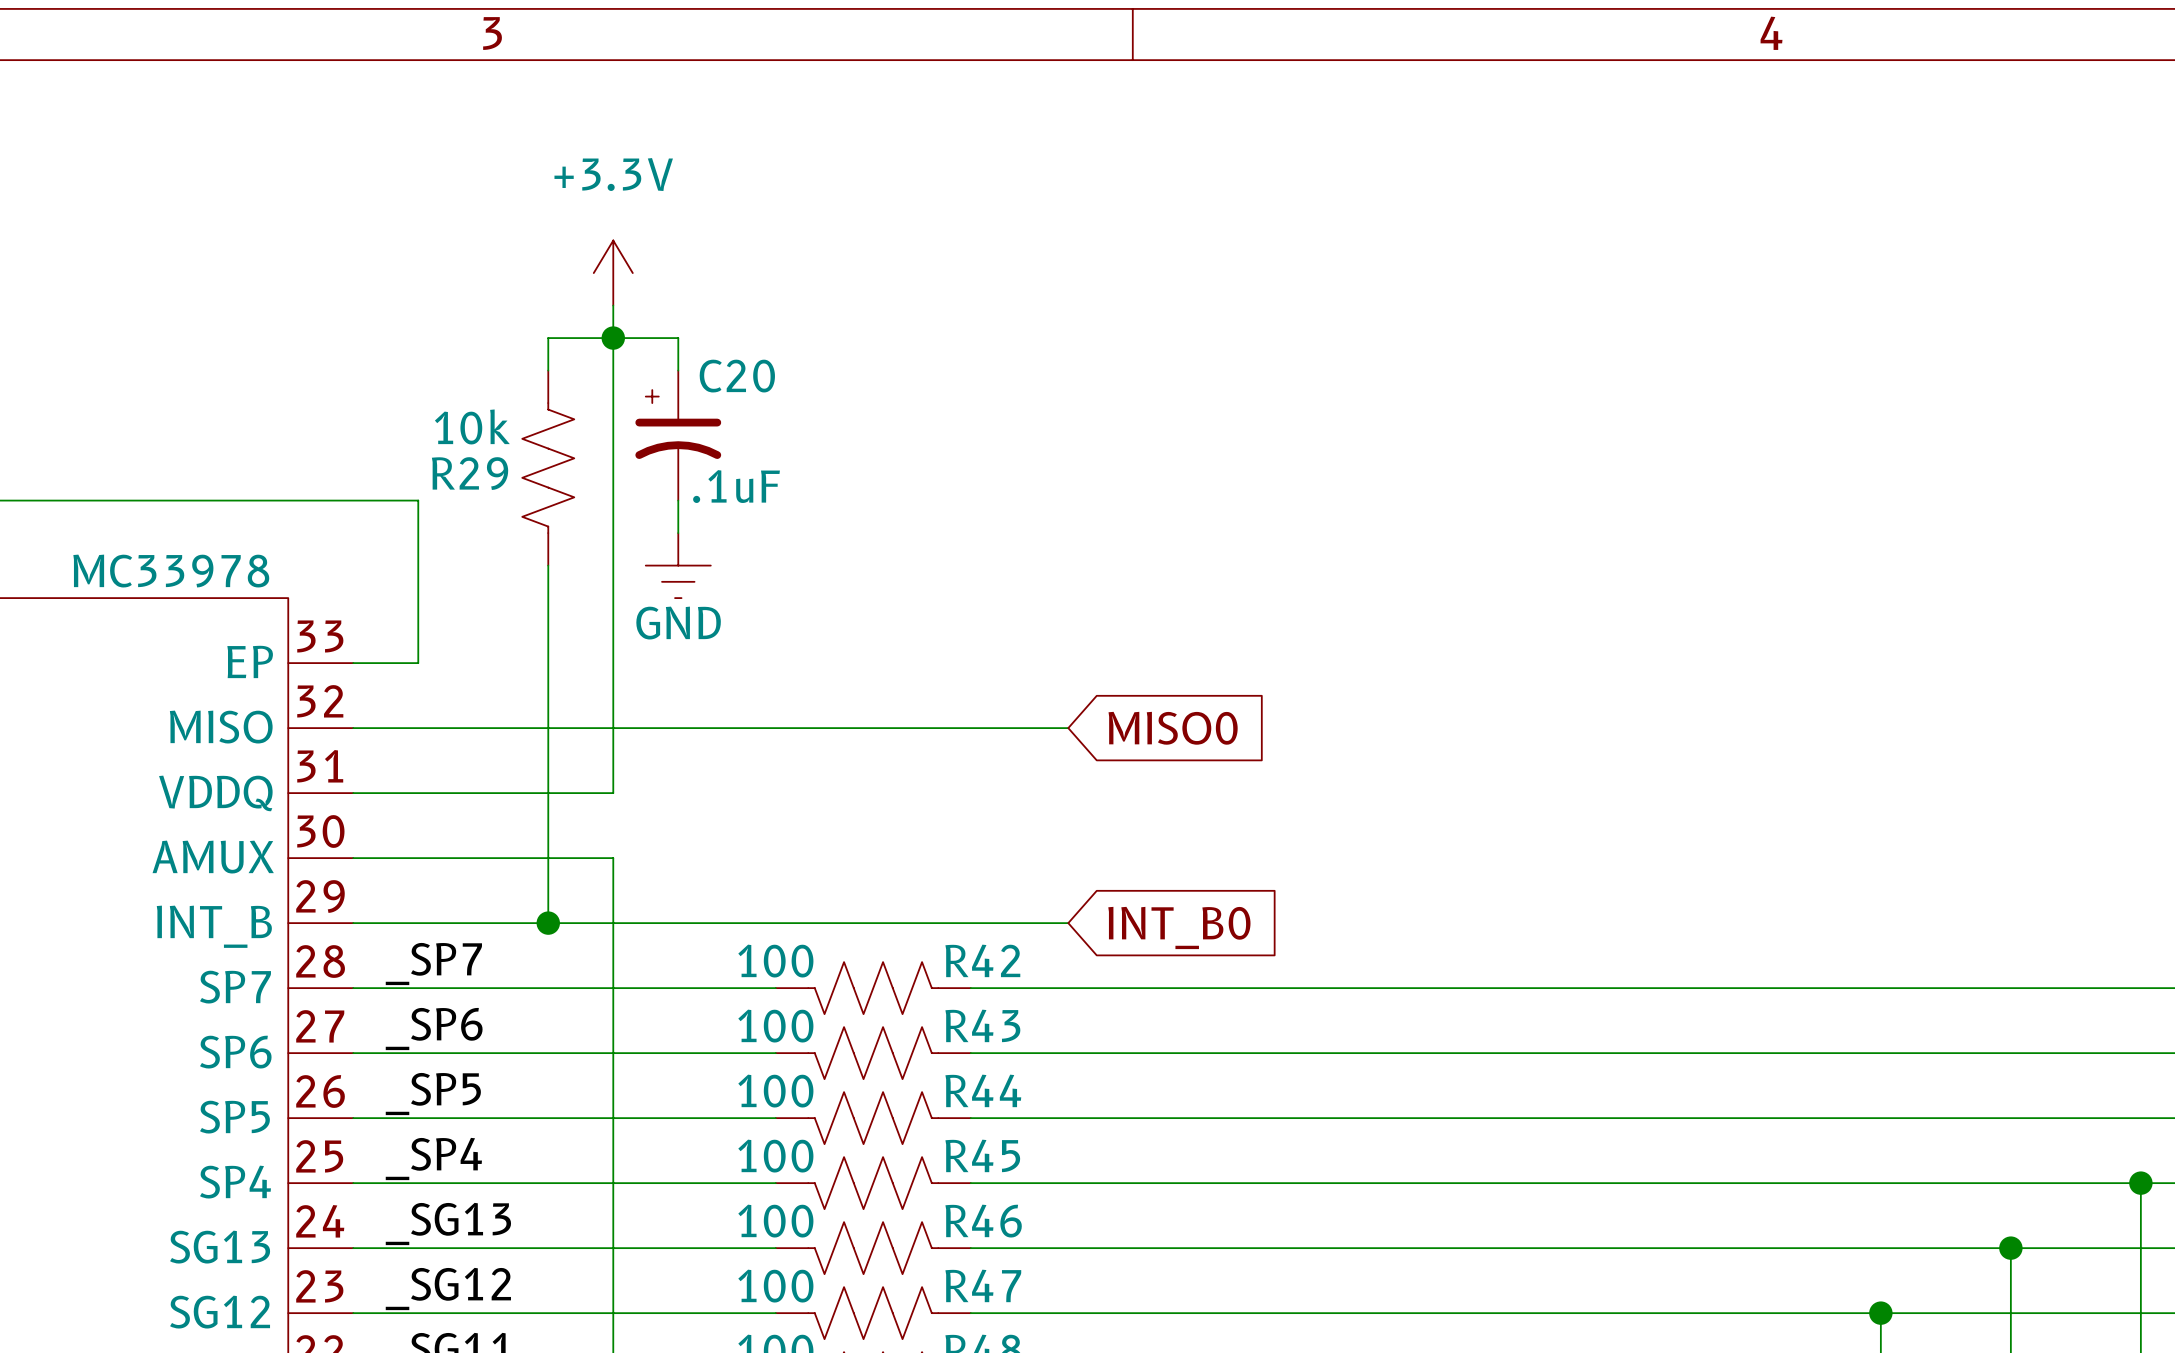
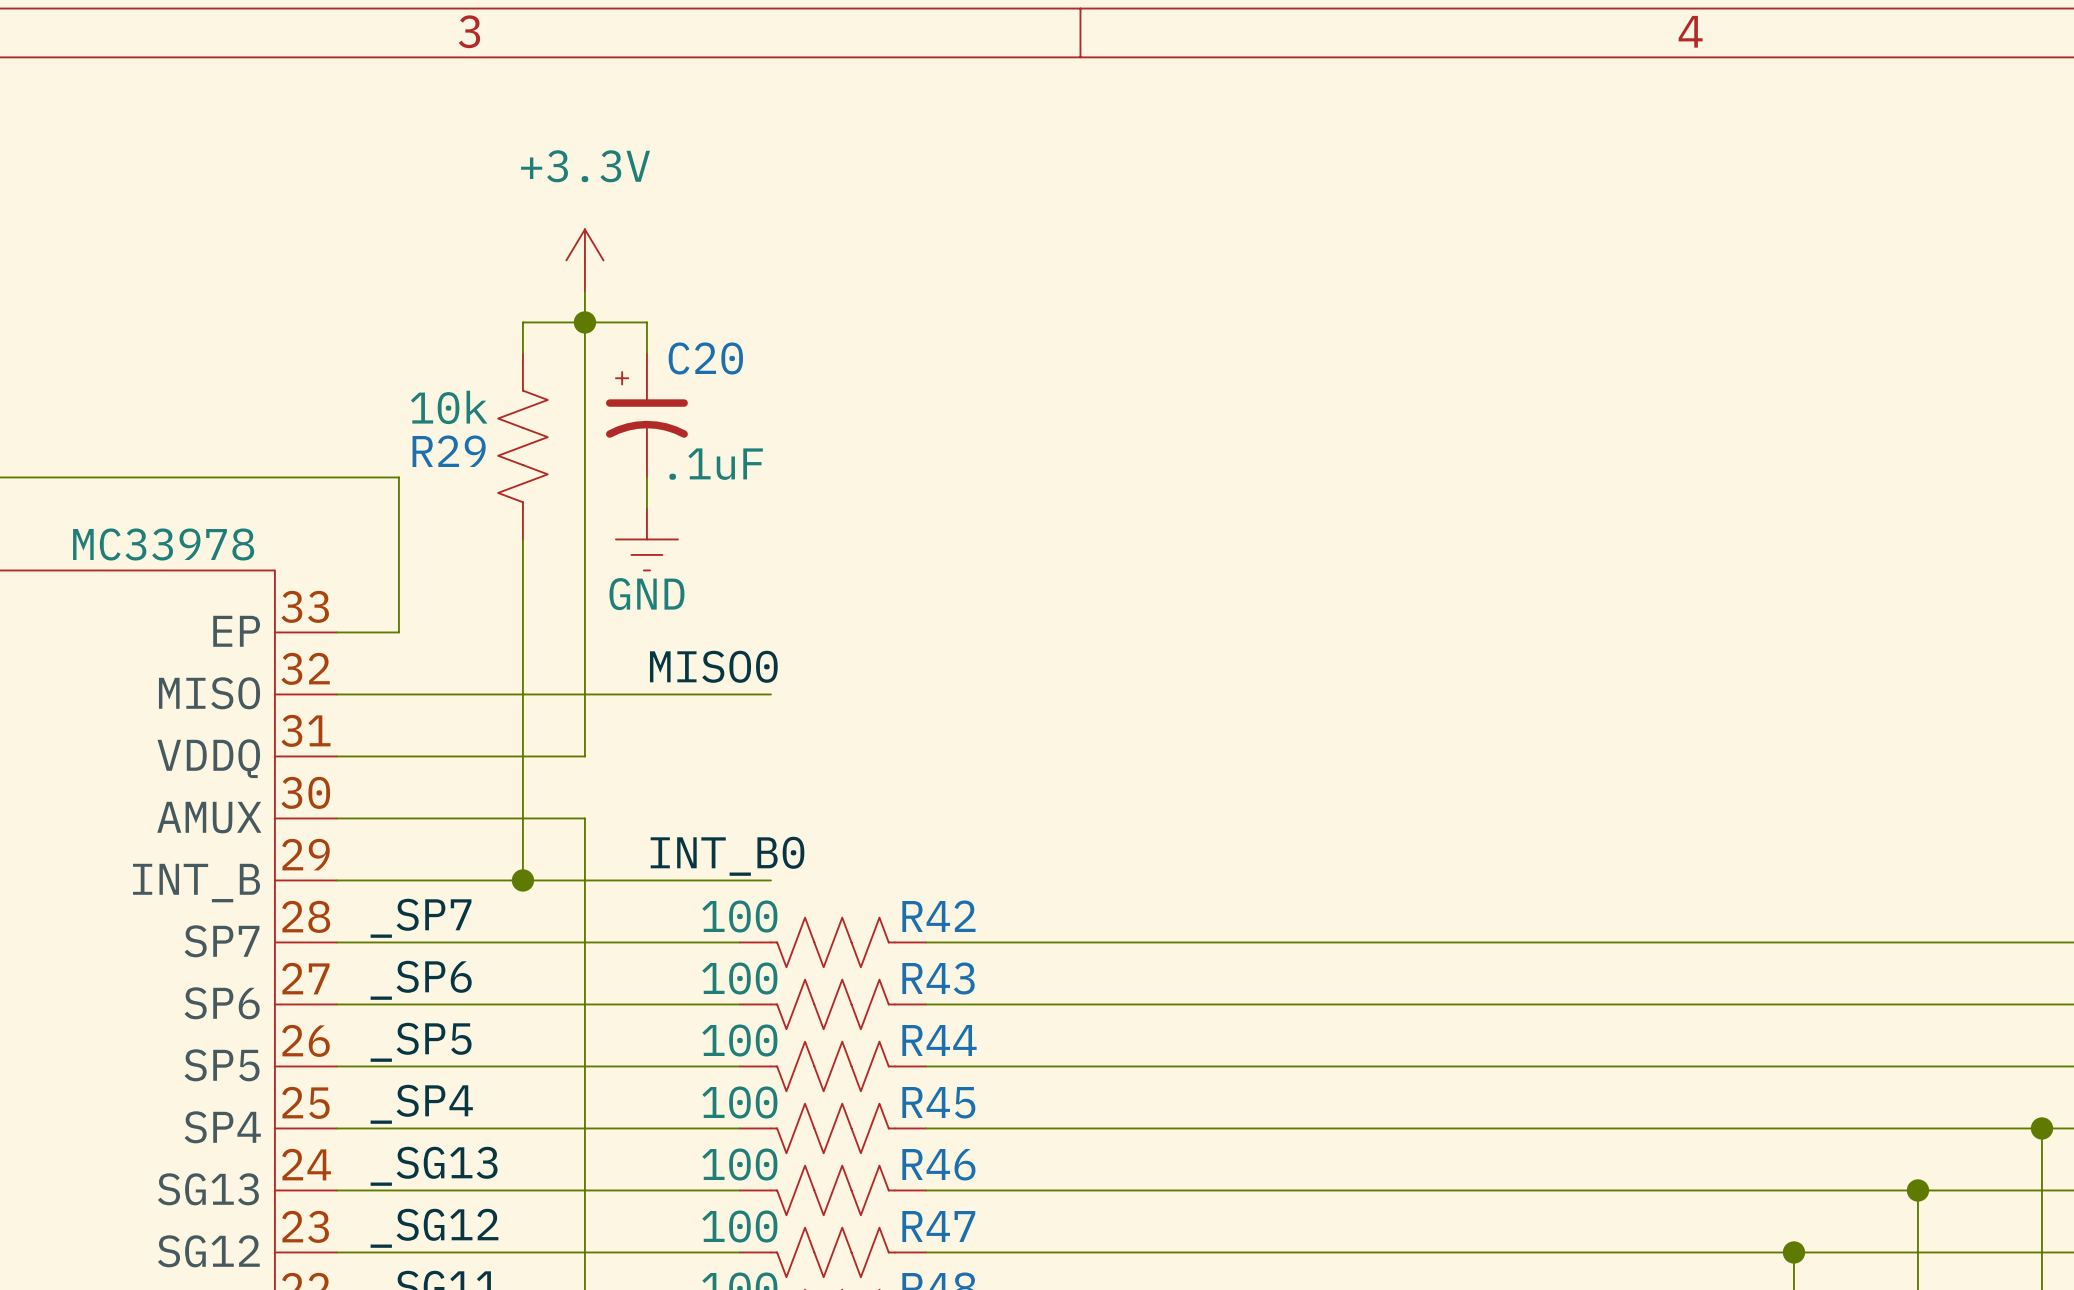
label: none -> MISO0 (713, 666)
wire: (808, 728) (1068, 728) -> none
global label: MISO0 (1173, 728) -> none
label: none -> INT_B0 (727, 856)
wire: (808, 923) (1068, 923) -> none
global label: INT_B0 (1179, 927) -> none

